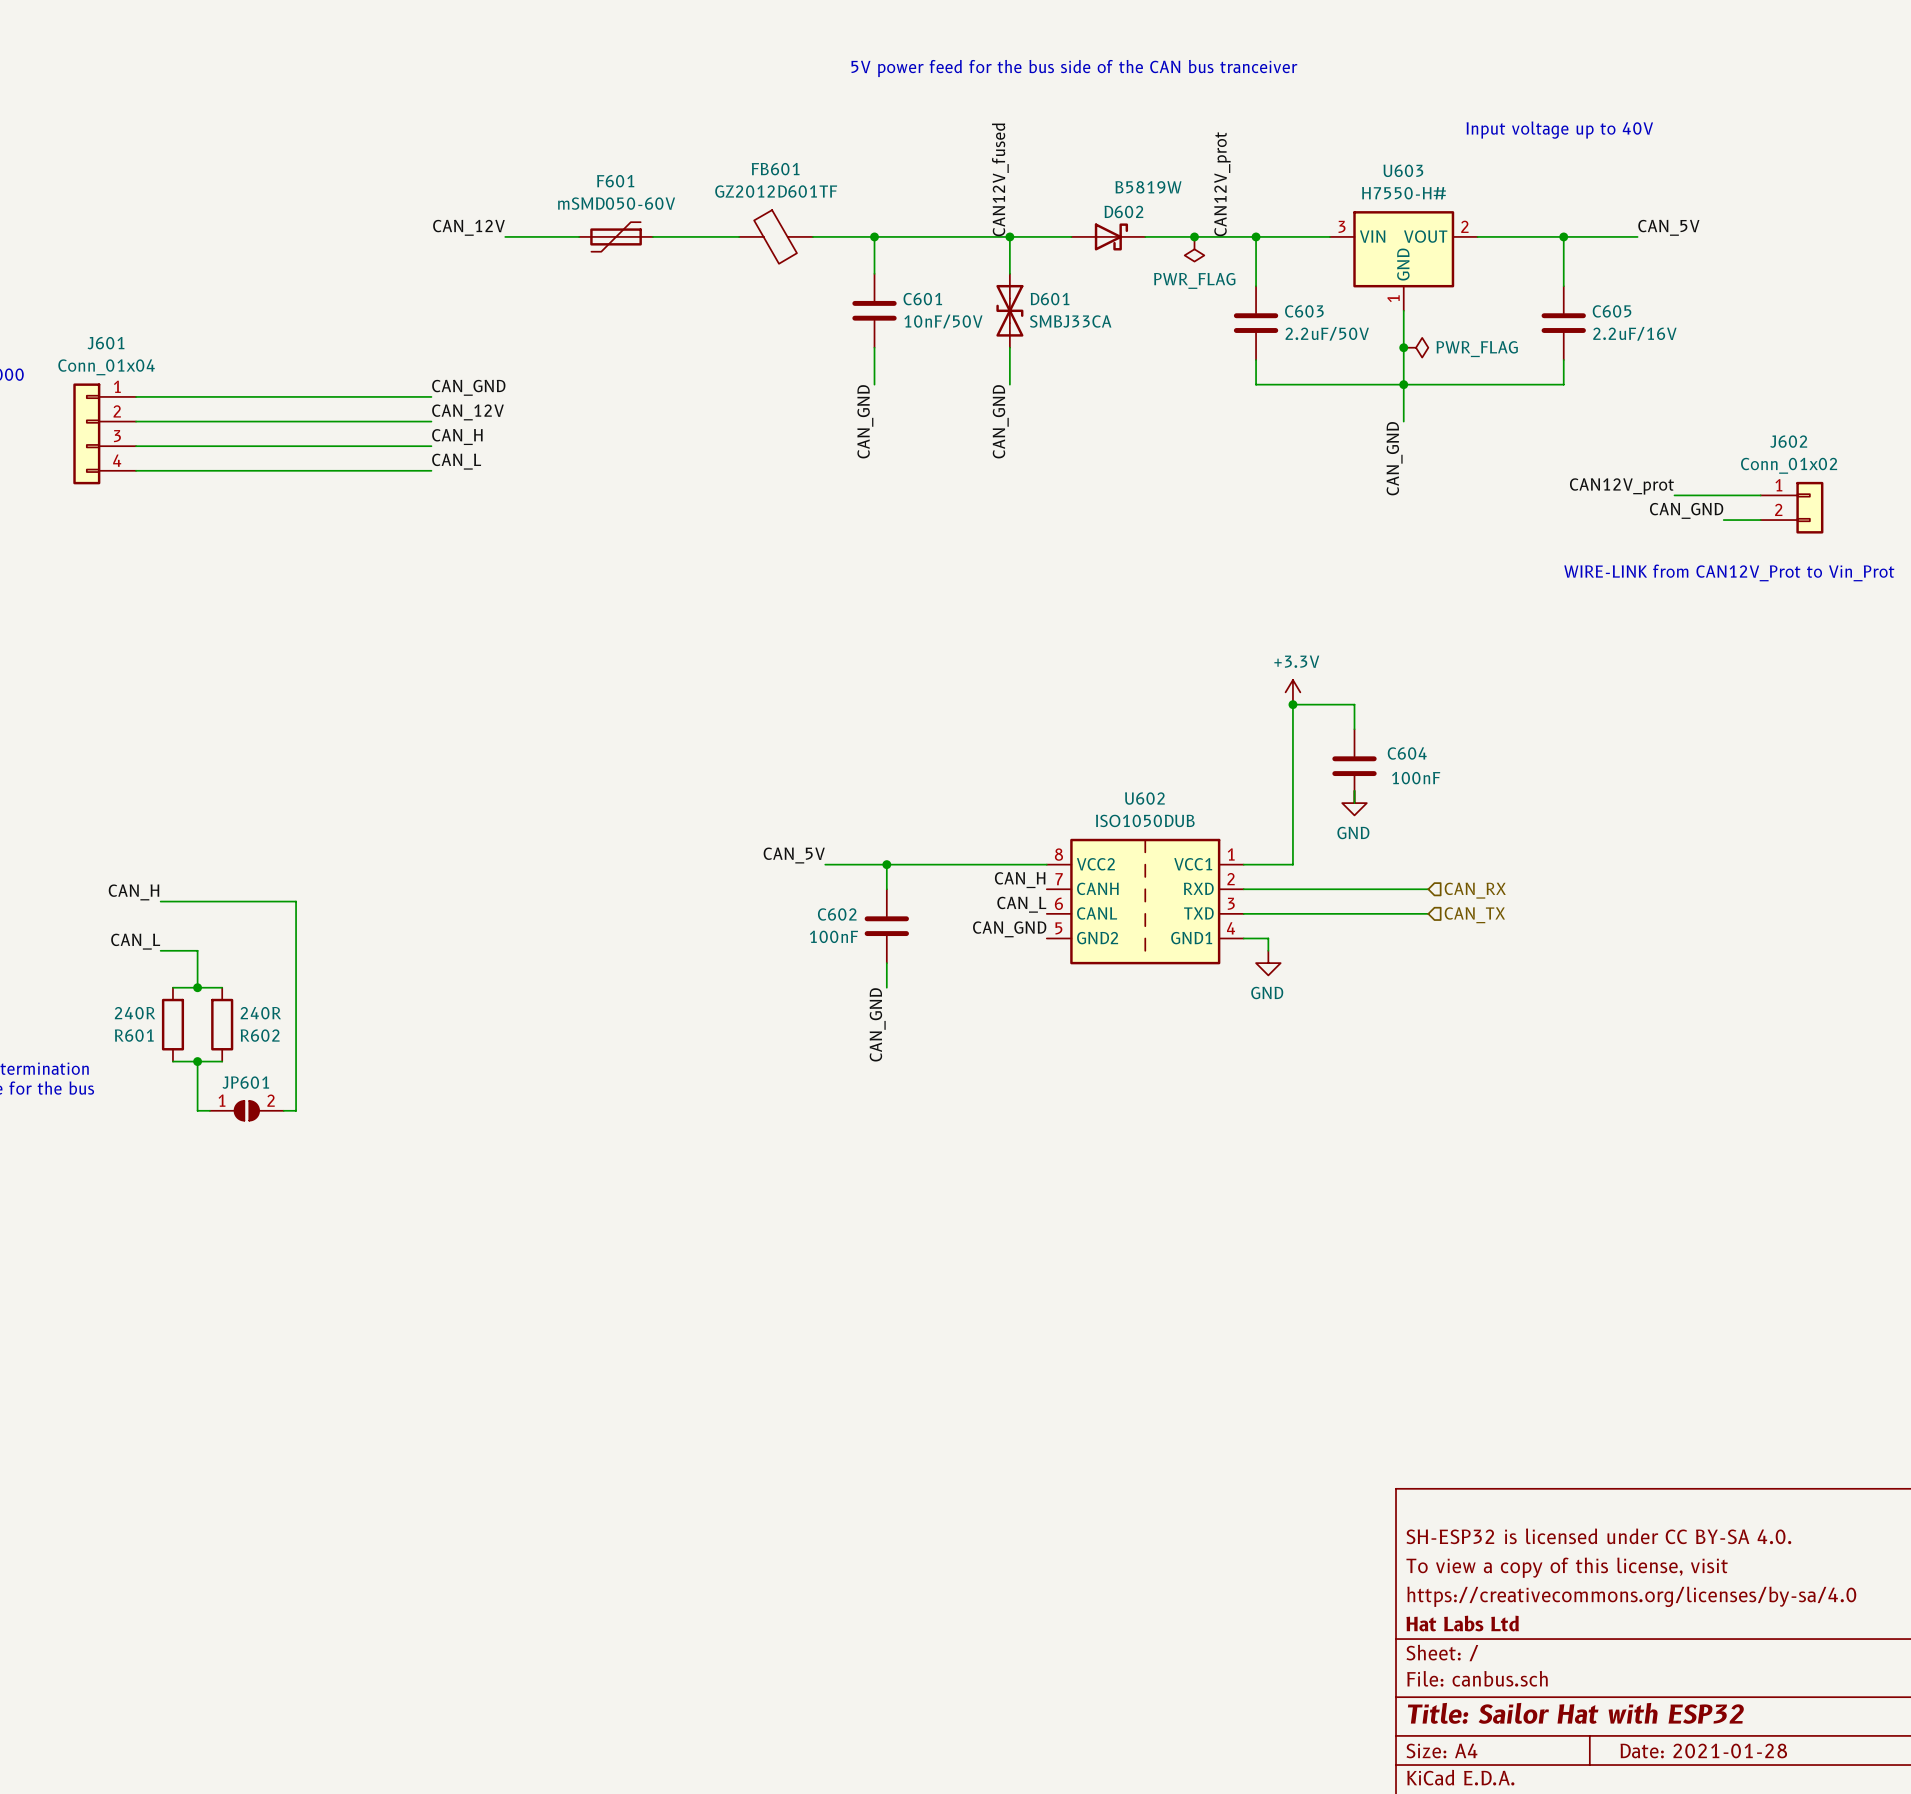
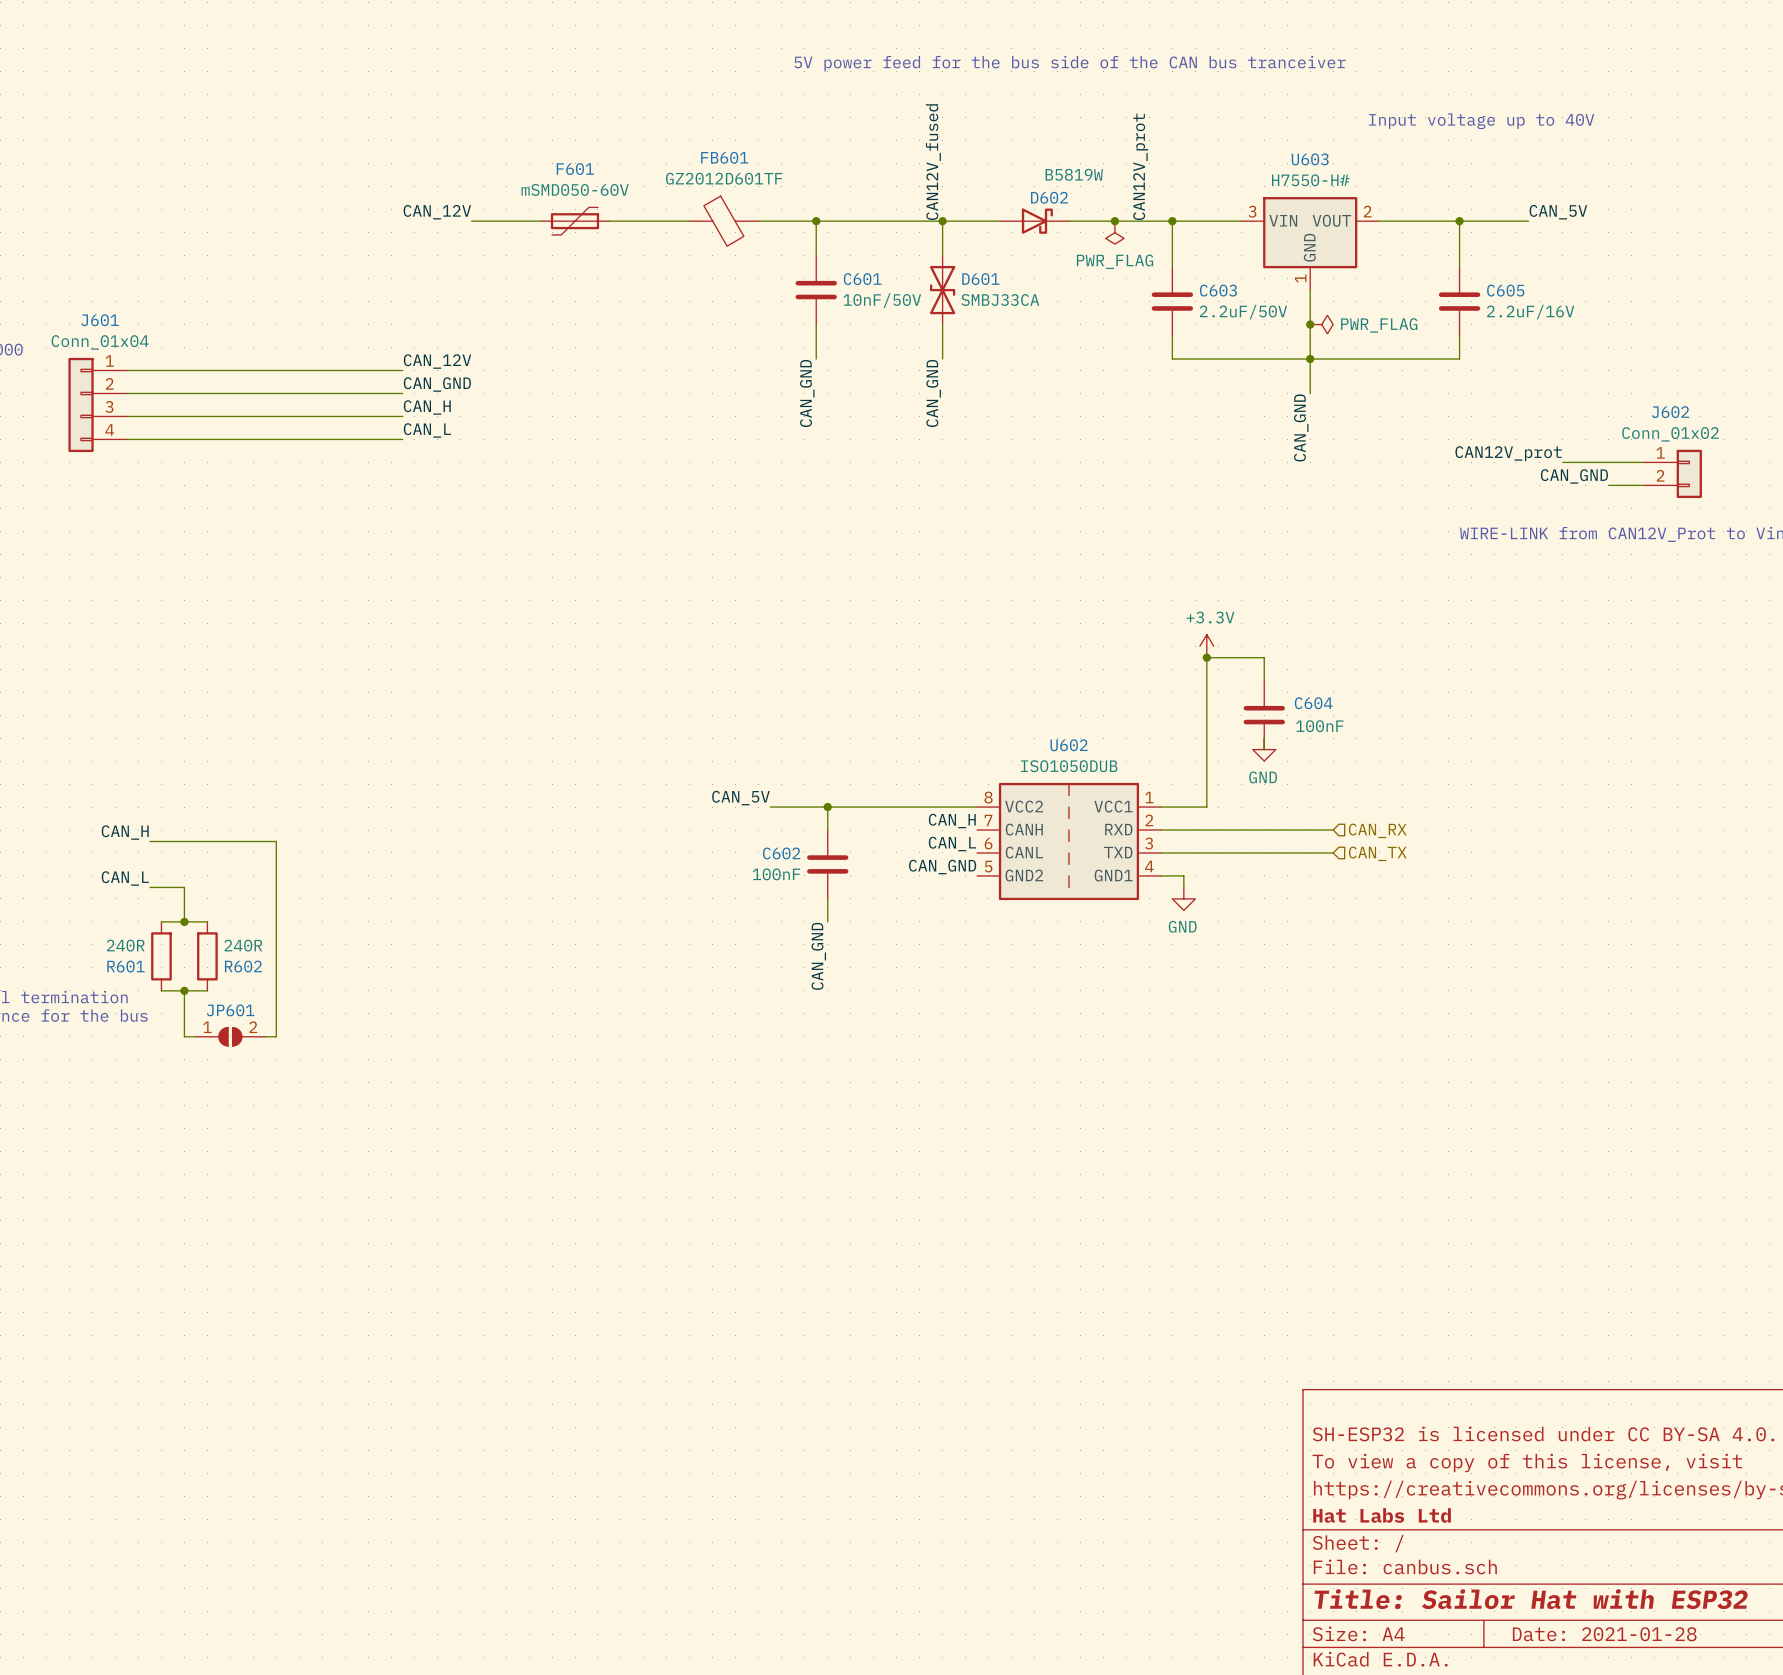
label: CAN_GND (468, 387) -> CAN_12V (437, 361)
label: CAN_12V (467, 412) -> CAN_GND (437, 384)

